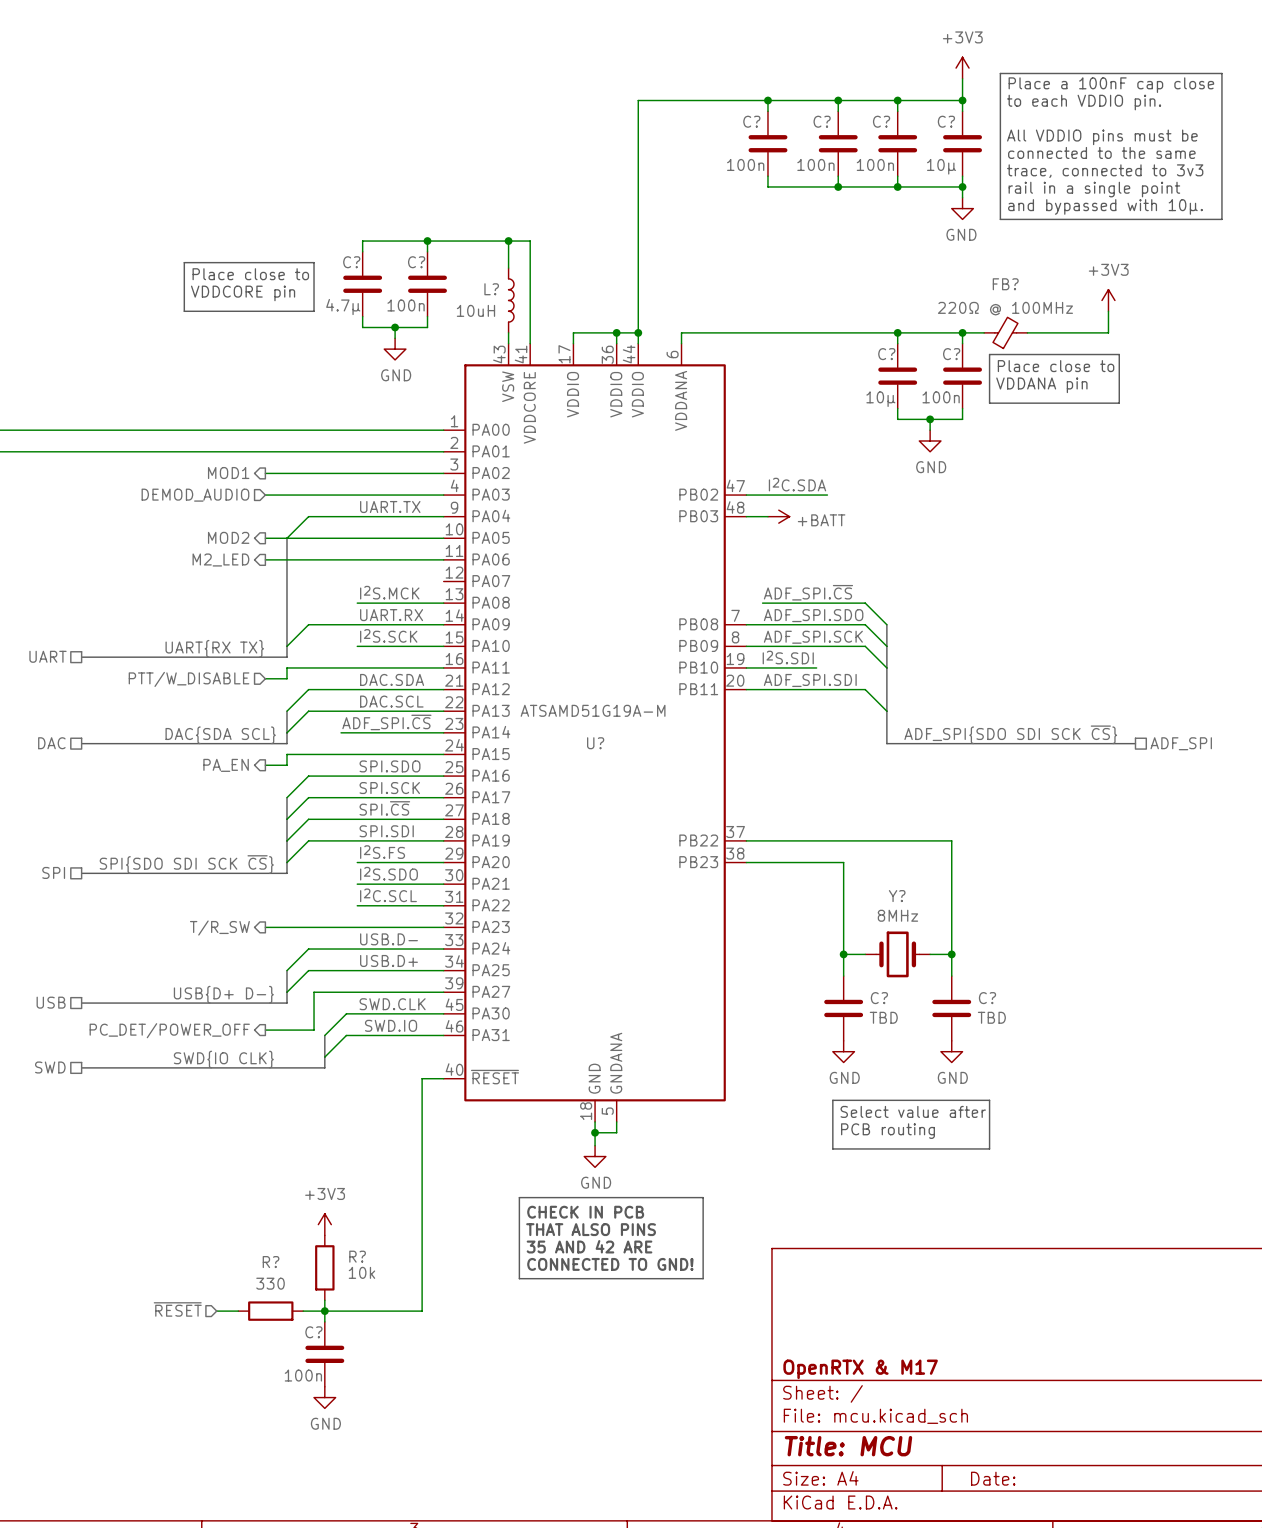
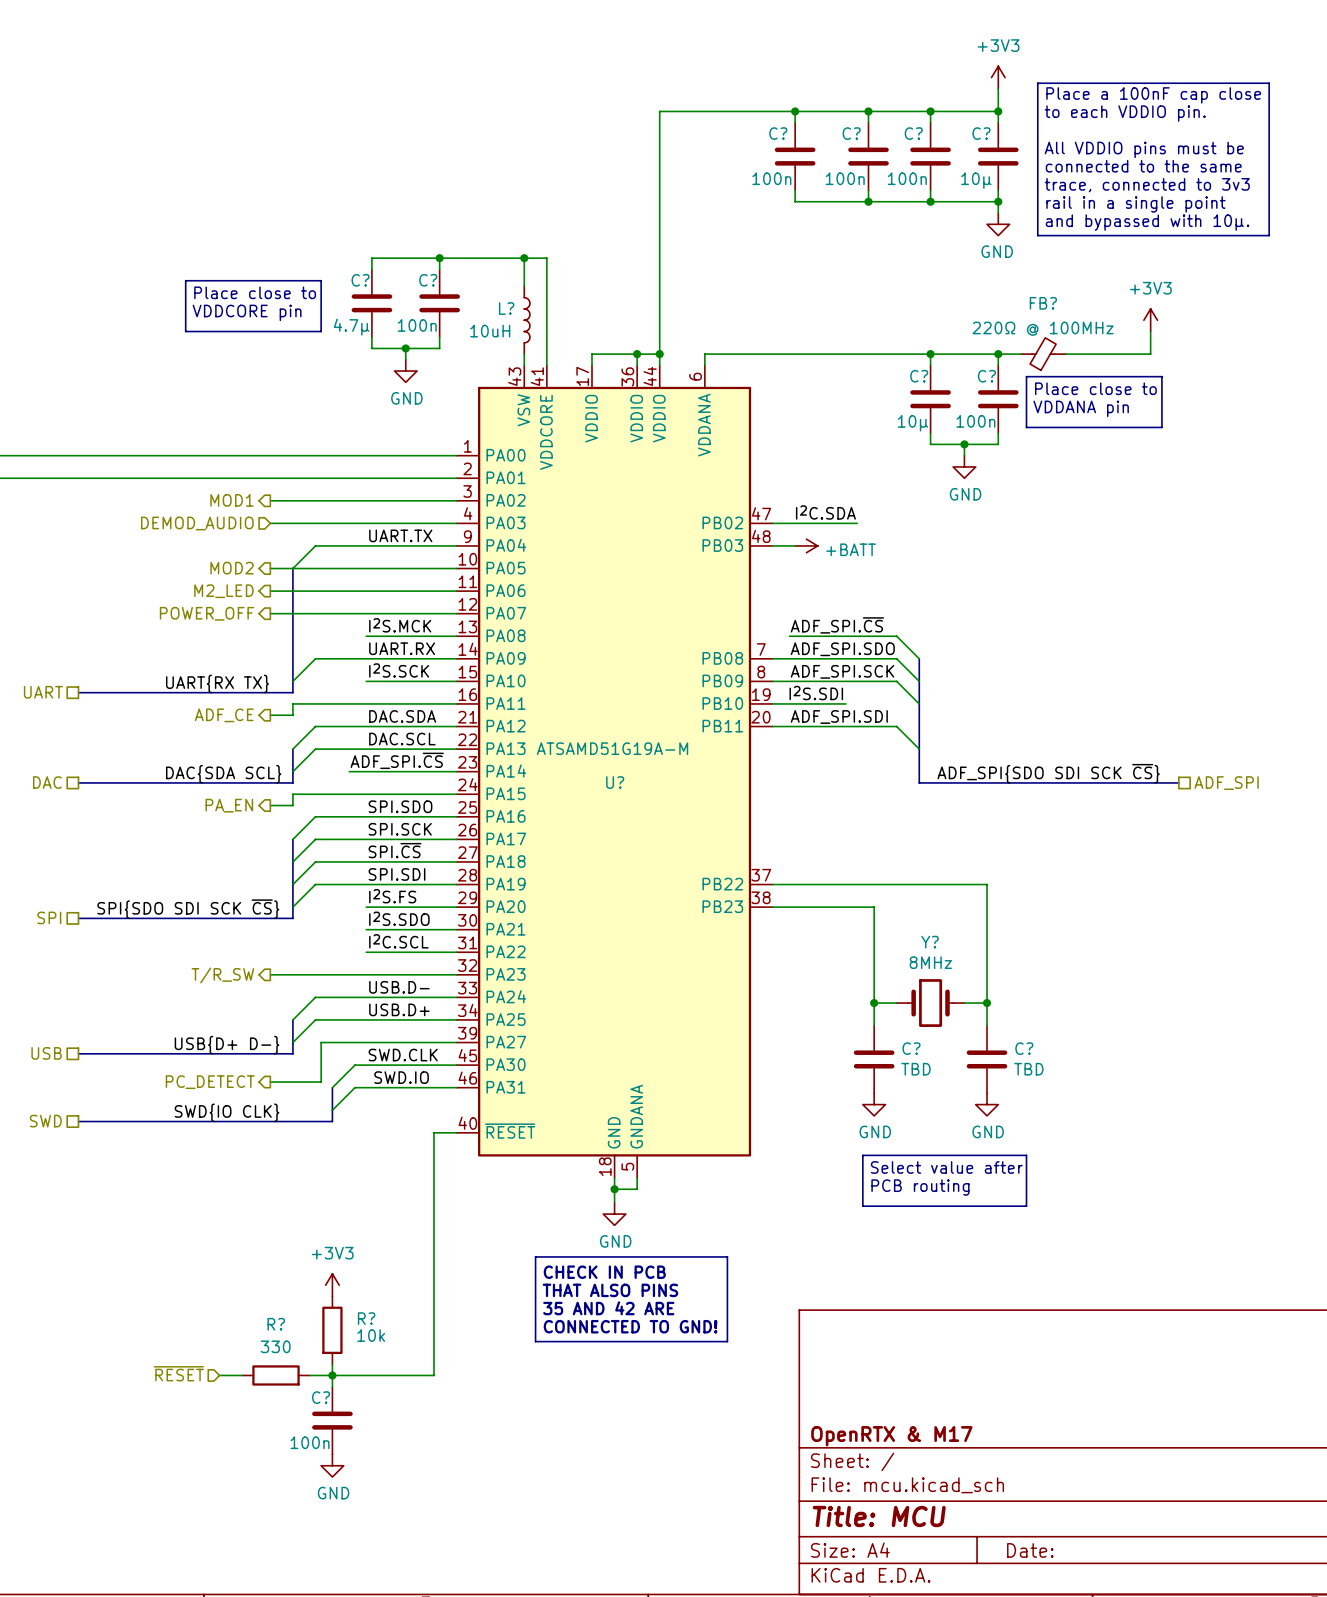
hierarchical label: none -> POWER_OFF (207, 613)
wire: none -> (270, 613) (456, 613)
hierarchical label shape: input (189, 679) -> output (224, 715)
hierarchical label: PTT/W_DISABLE (189, 679) -> ADF_CE (224, 715)
hierarchical label: PC_DET/POWER_OFF (169, 1030) -> PC_DETECT (210, 1082)

